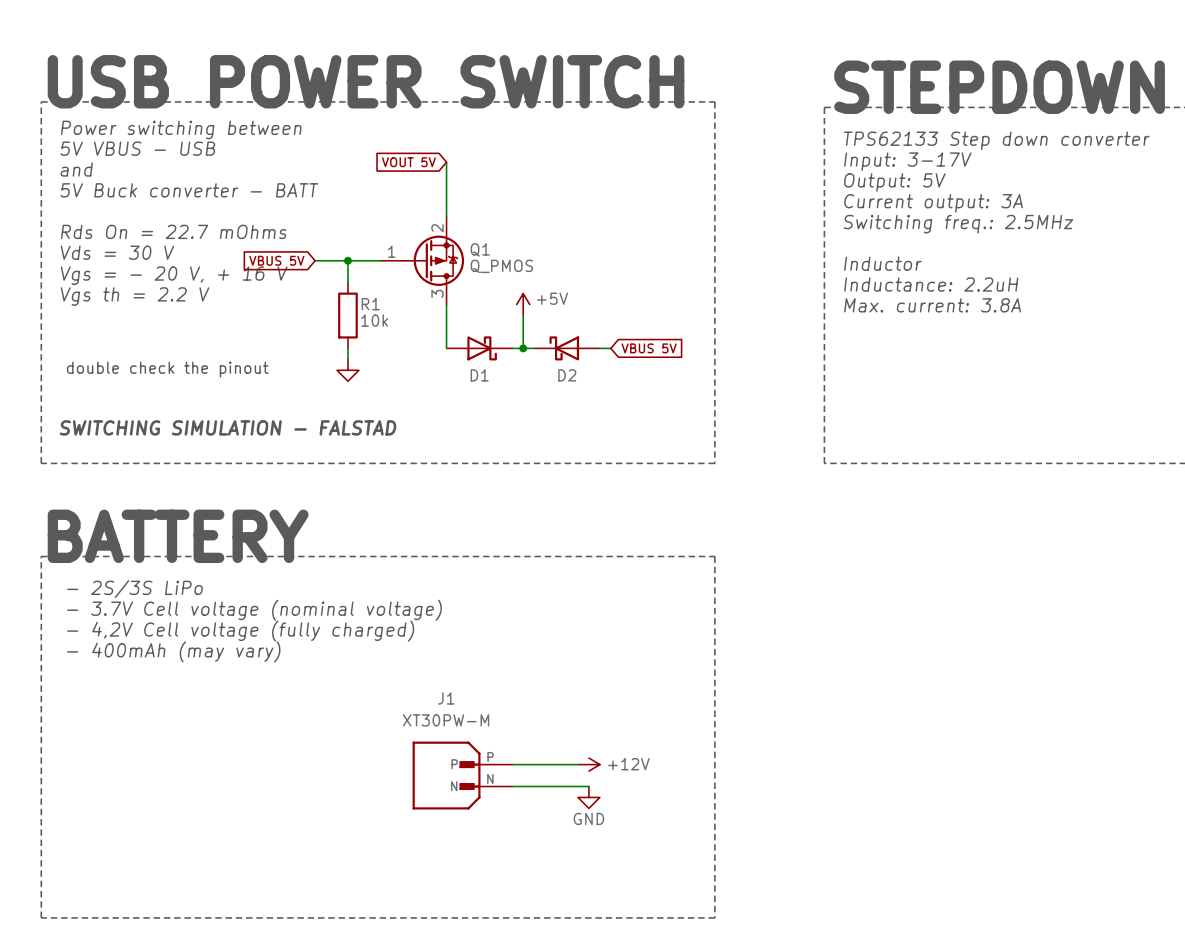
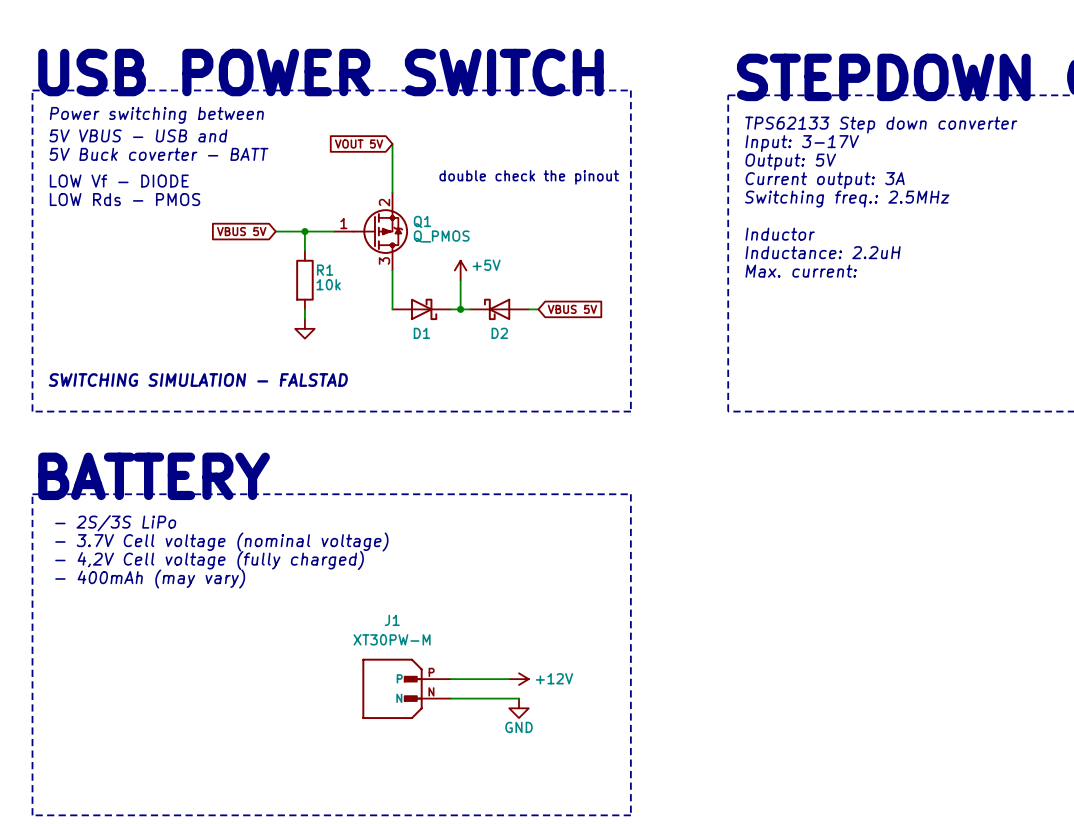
text: 5V VBUS - USB (137, 148) -> 5V VBUS - USB and (138, 135)
text: and (76, 169) -> 5V Buck coverter - BATT (158, 154)
text: 5V Buck converter - BATT (189, 190) -> LOW Vf - DIODE (119, 181)
text: none -> double check the pinout (529, 177)
text: none -> LOW Rds - PMOS (125, 199)
text: Rds On = 22.7 mOhms (173, 231) -> none
text: Vds = 30 V (117, 252) -> none
text: Vgs = - 20 V, + 16 V (174, 275) -> none
text: Vgs th = 2.2 V (135, 296) -> none
text: Max. current: 3.8A (932, 305) -> Max. current: (801, 271)
text: double check the pinout (167, 369) -> none

